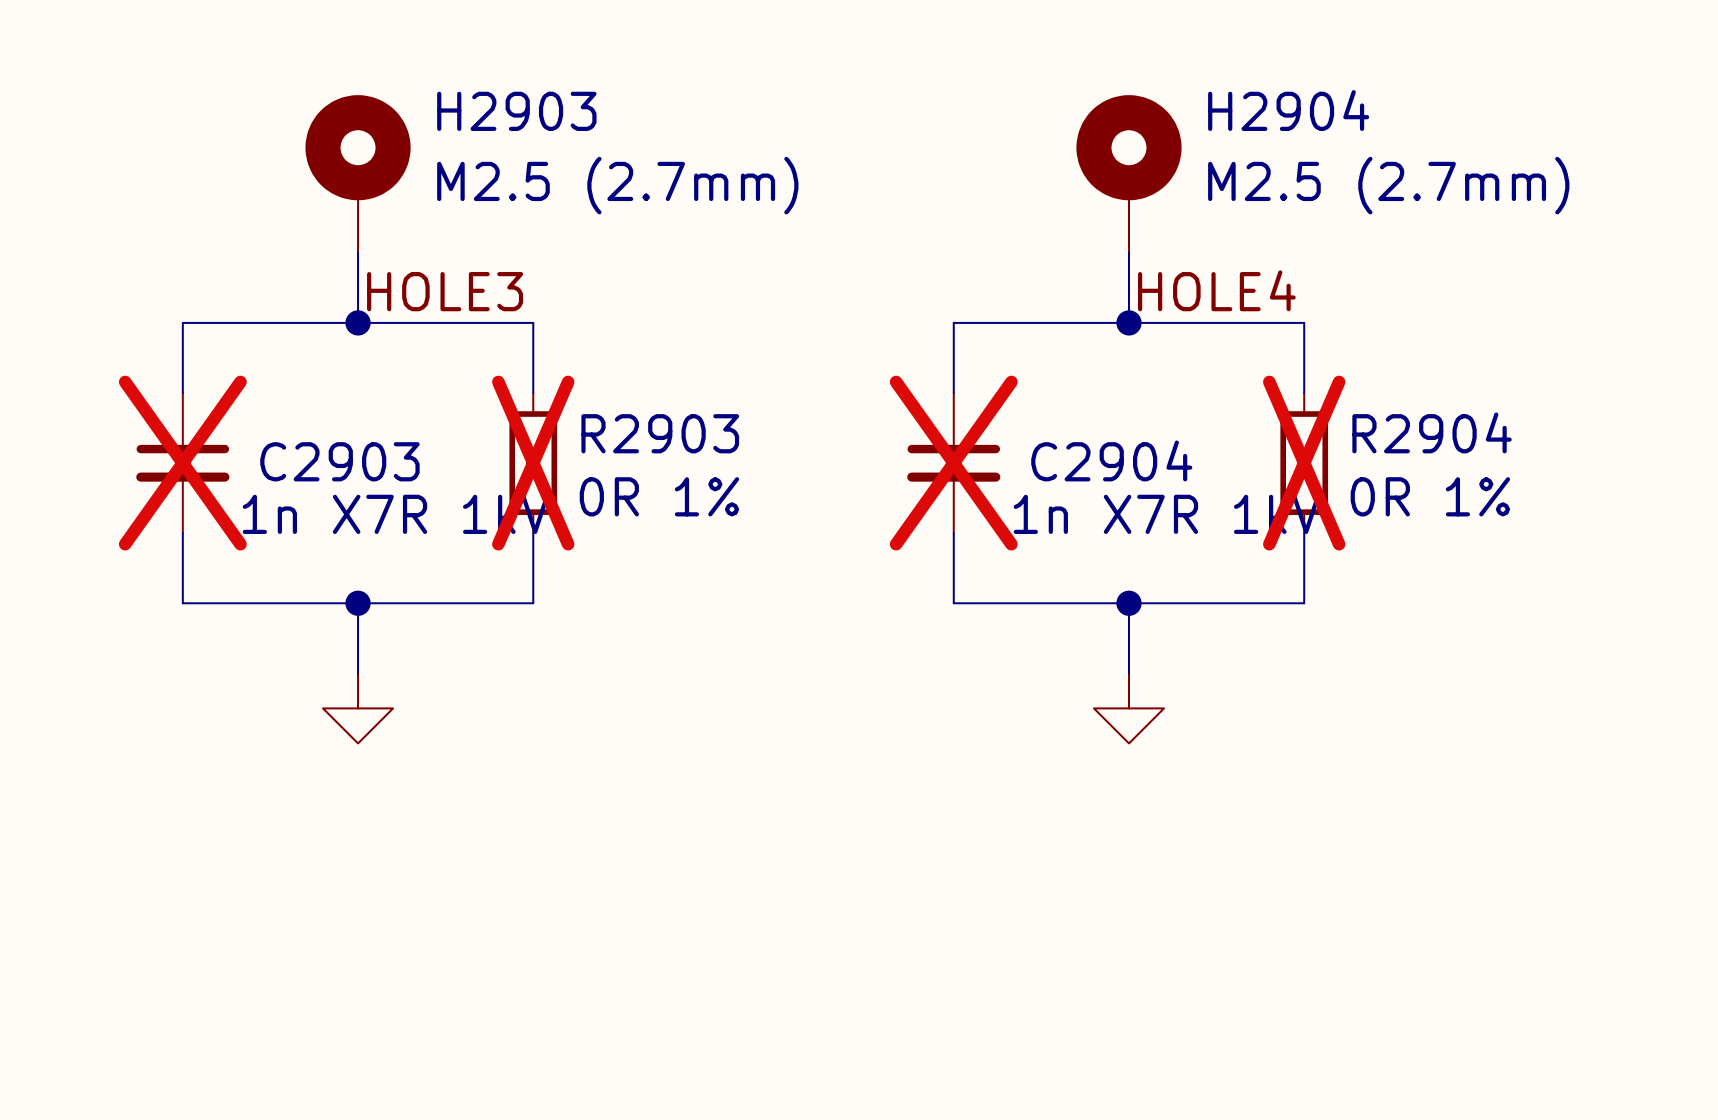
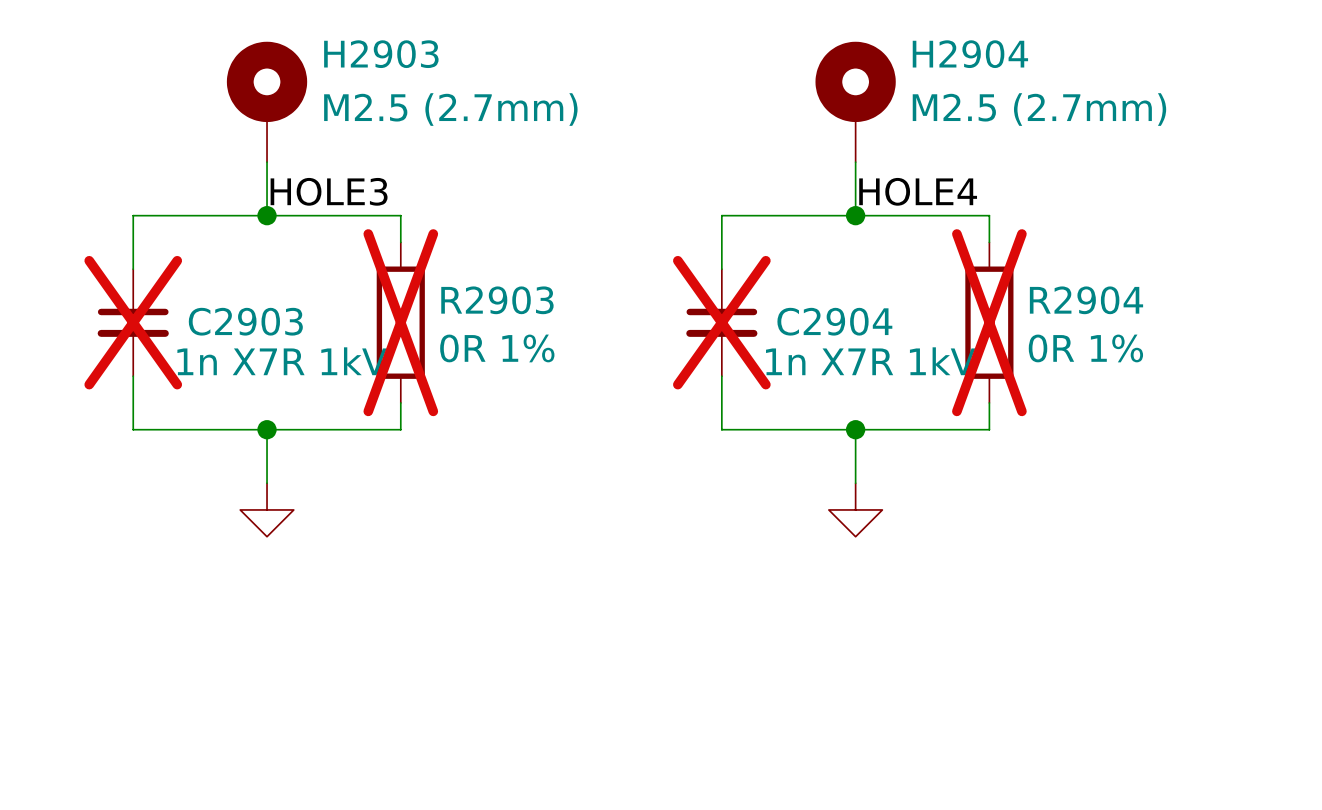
R2903 symbol: [509, 393, 558, 534] -> [376, 242, 425, 403]
R2904 symbol: [1280, 393, 1329, 534] -> [965, 242, 1014, 403]

